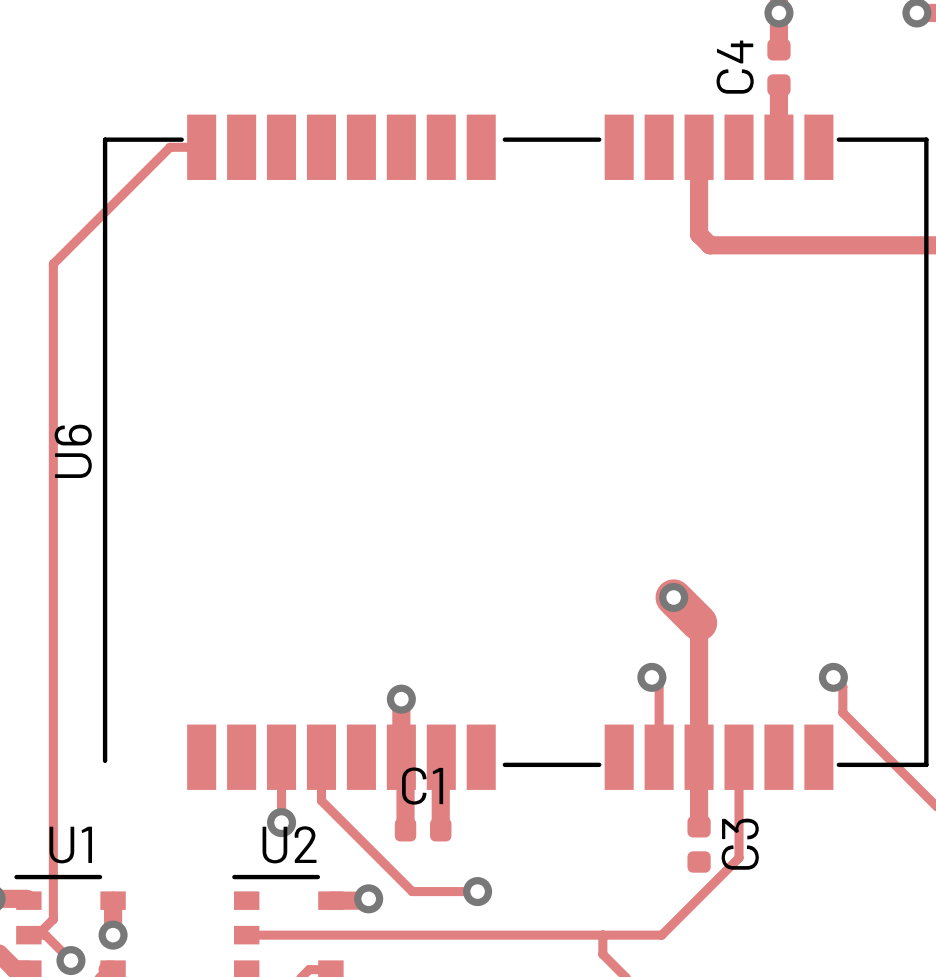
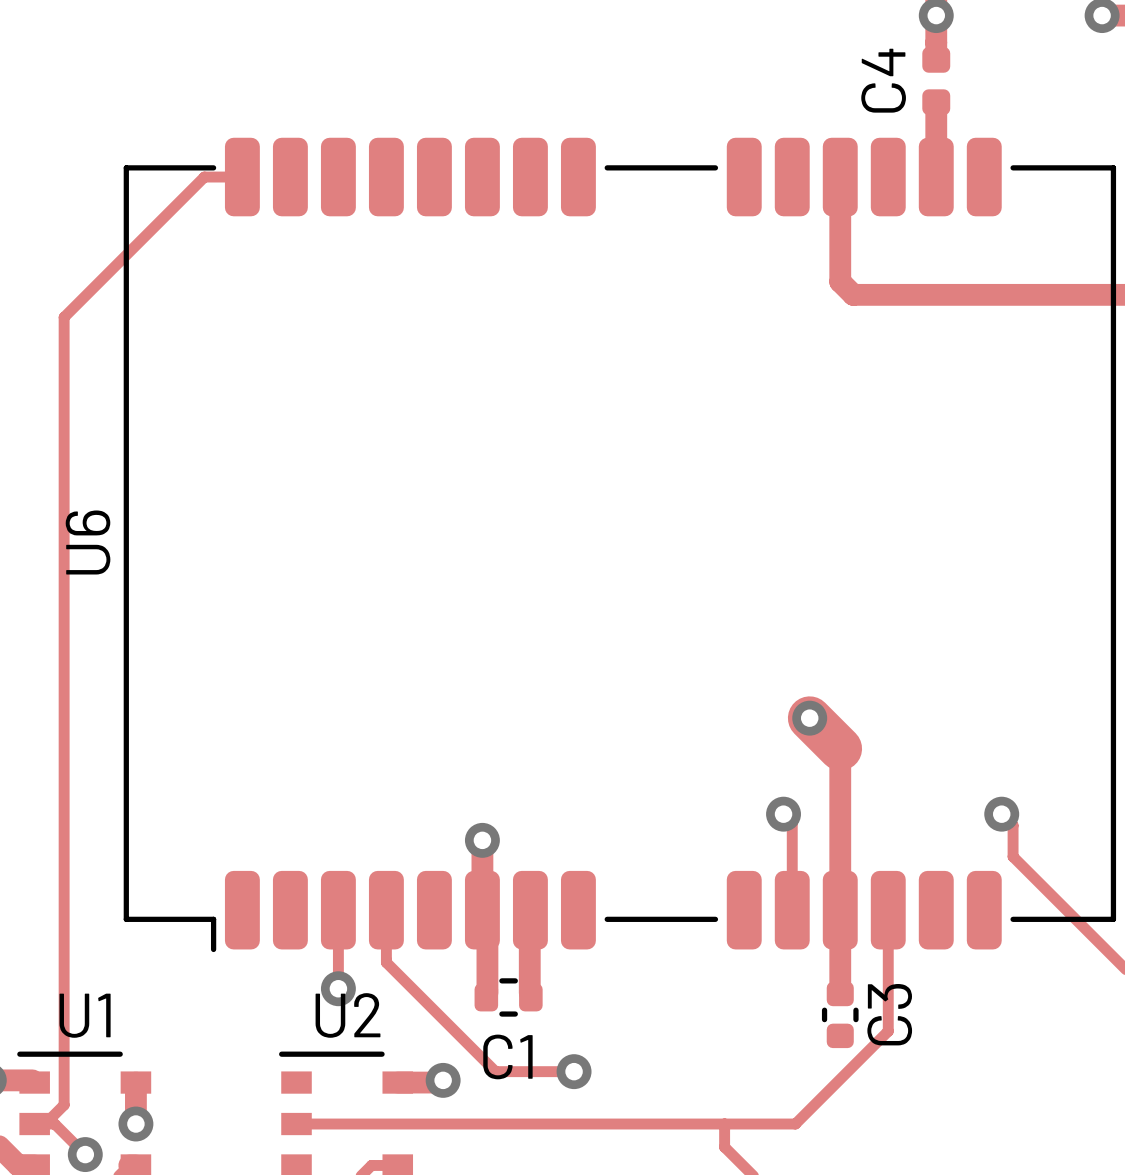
U6 footprint: [102, 114, 929, 790] -> [123, 137, 1117, 953]
C1 name position: C1 (422, 786) -> C1 (507, 1056)
C3 footprint: [687, 816, 711, 873] -> [821, 981, 859, 1049]
C1 footprint: [394, 818, 452, 842] -> [474, 978, 543, 1017]

